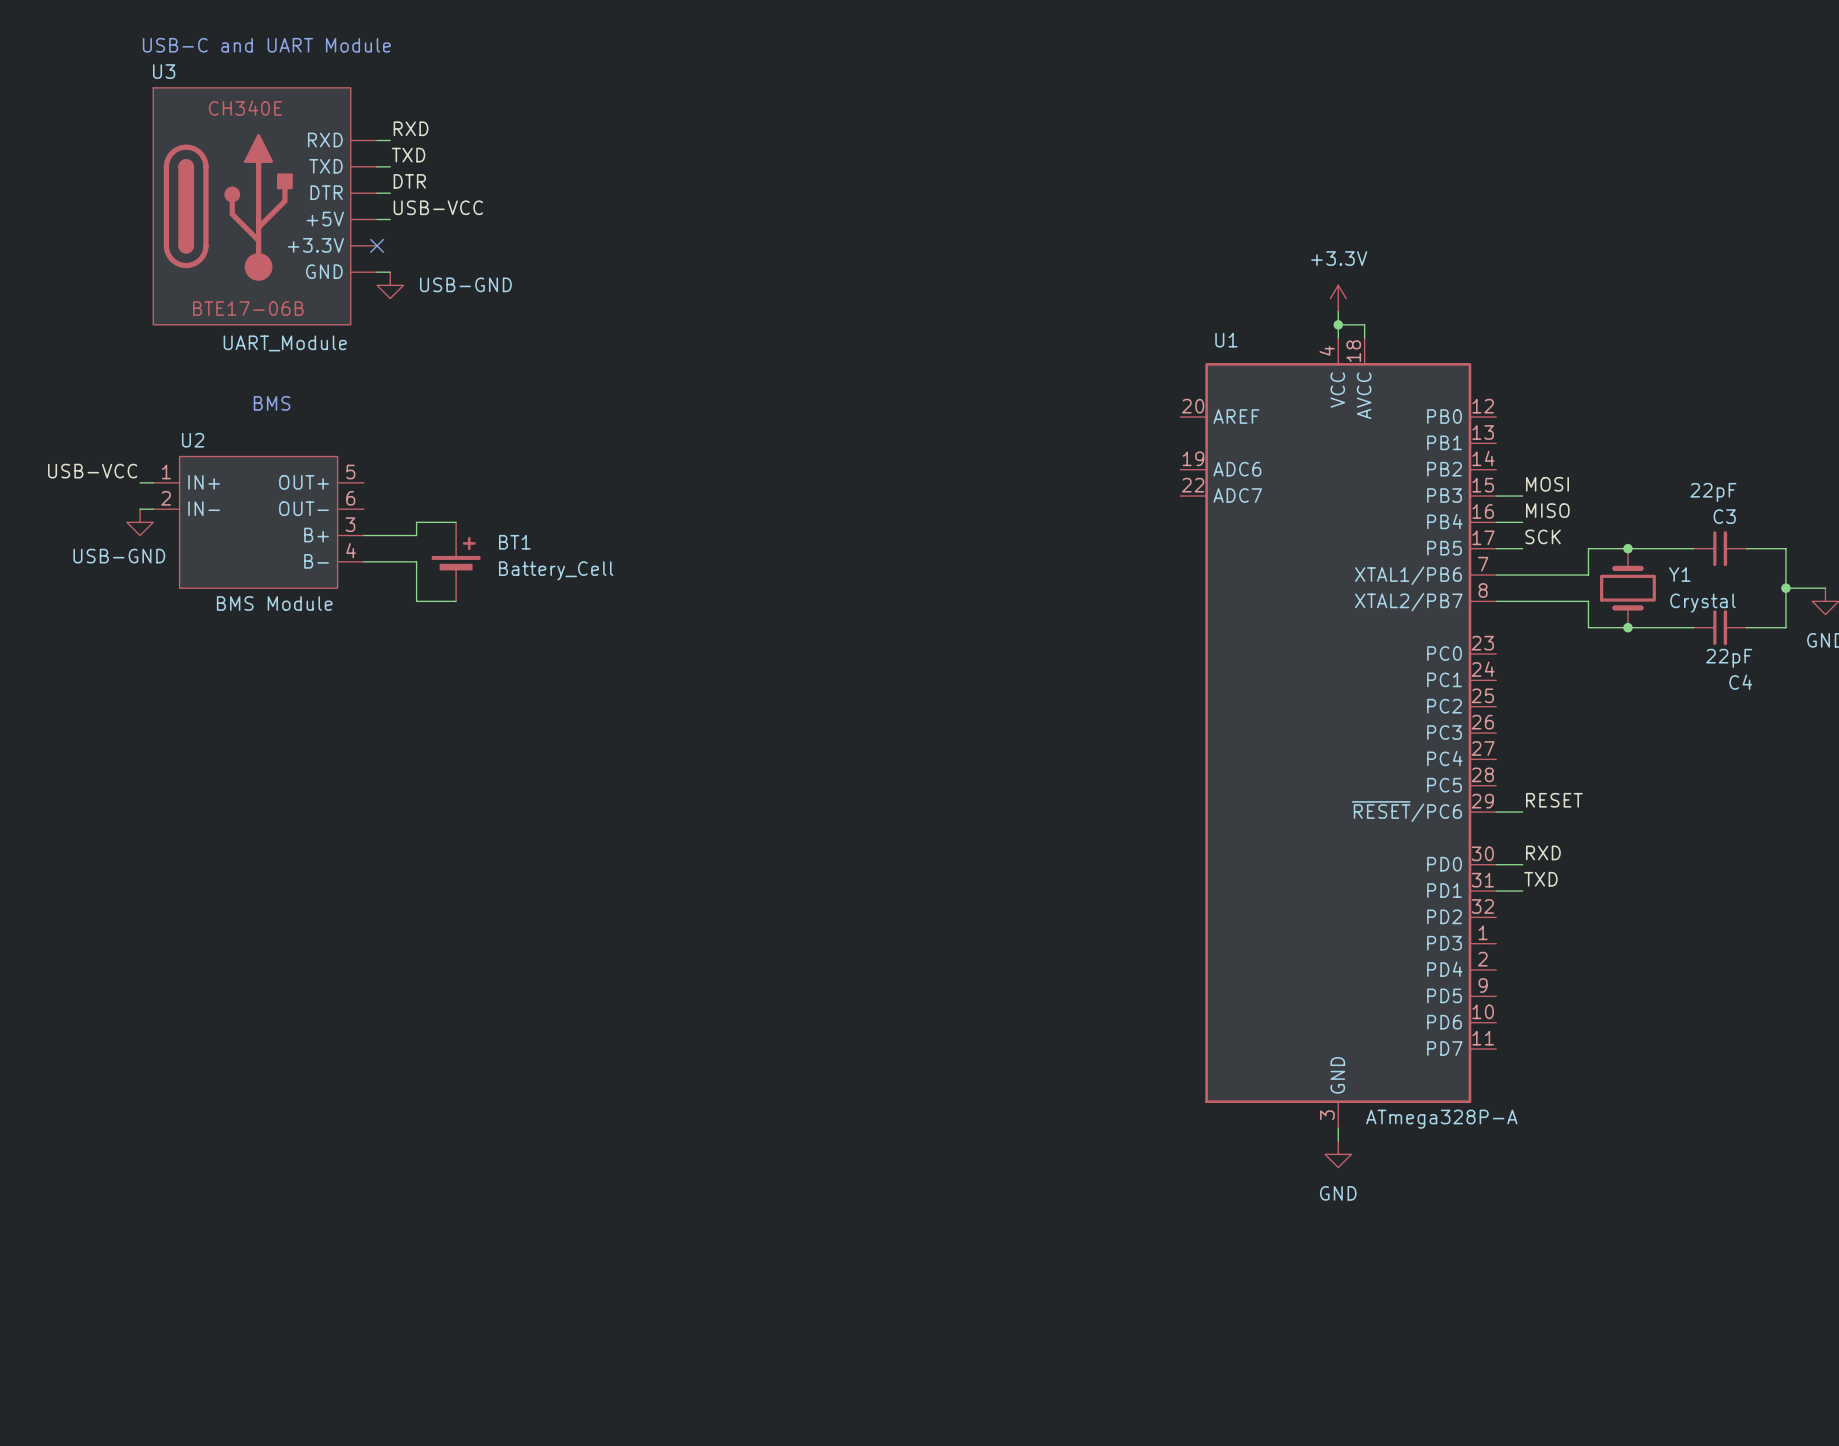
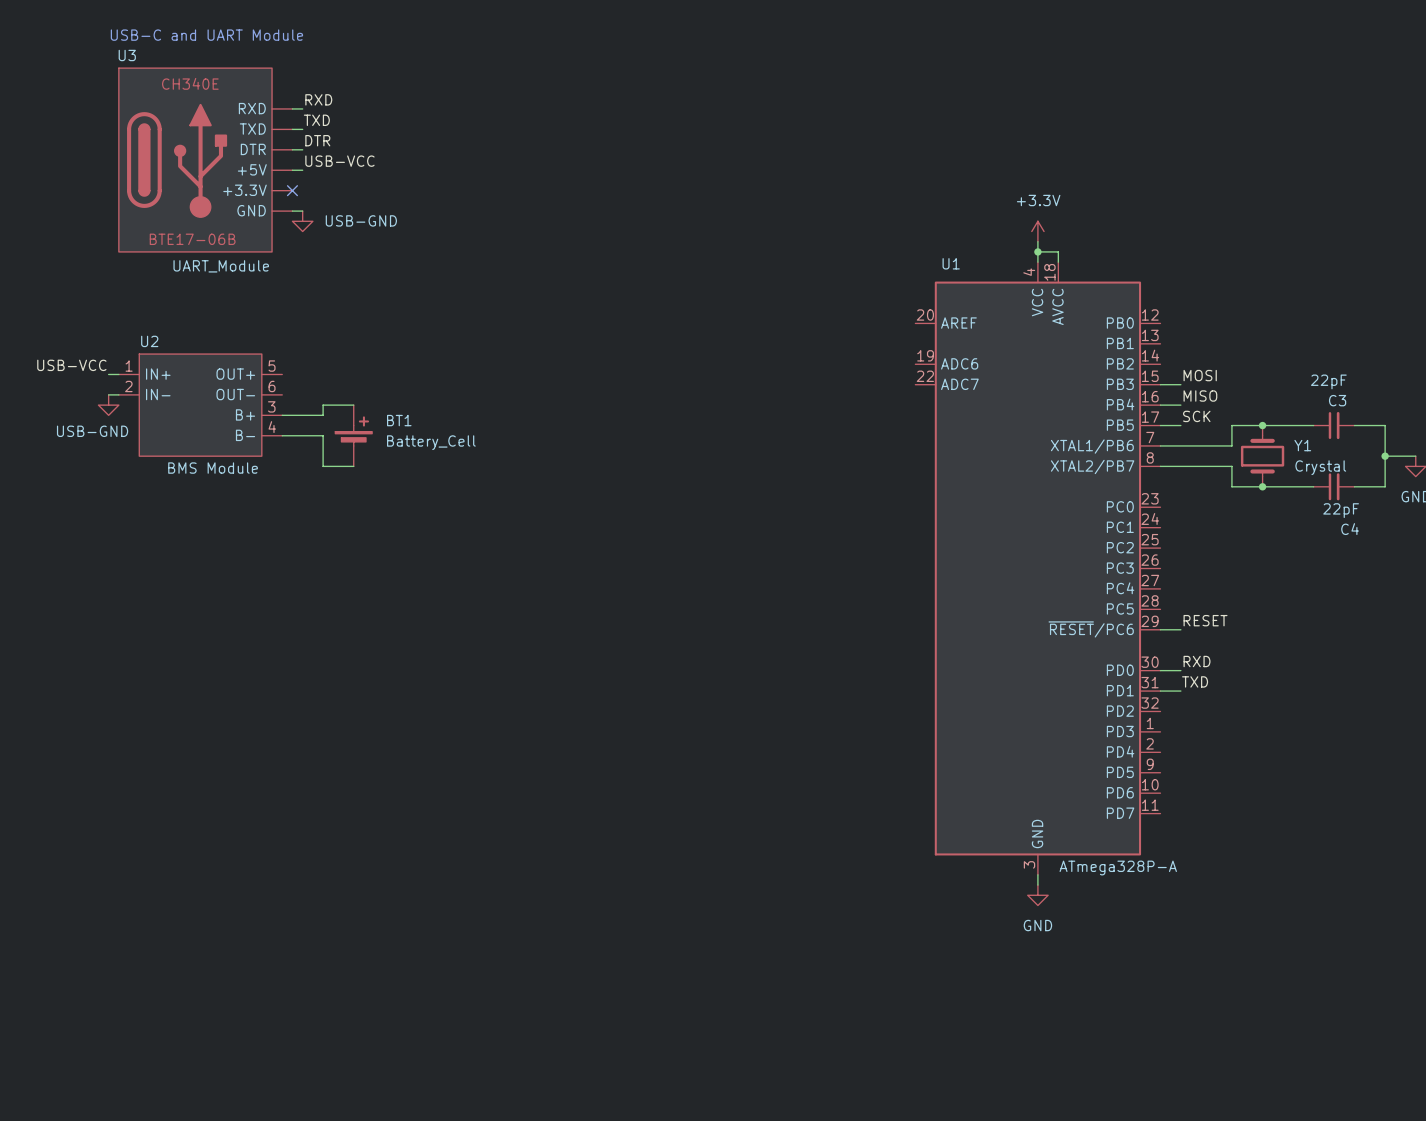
text: BMS (272, 403) -> none

